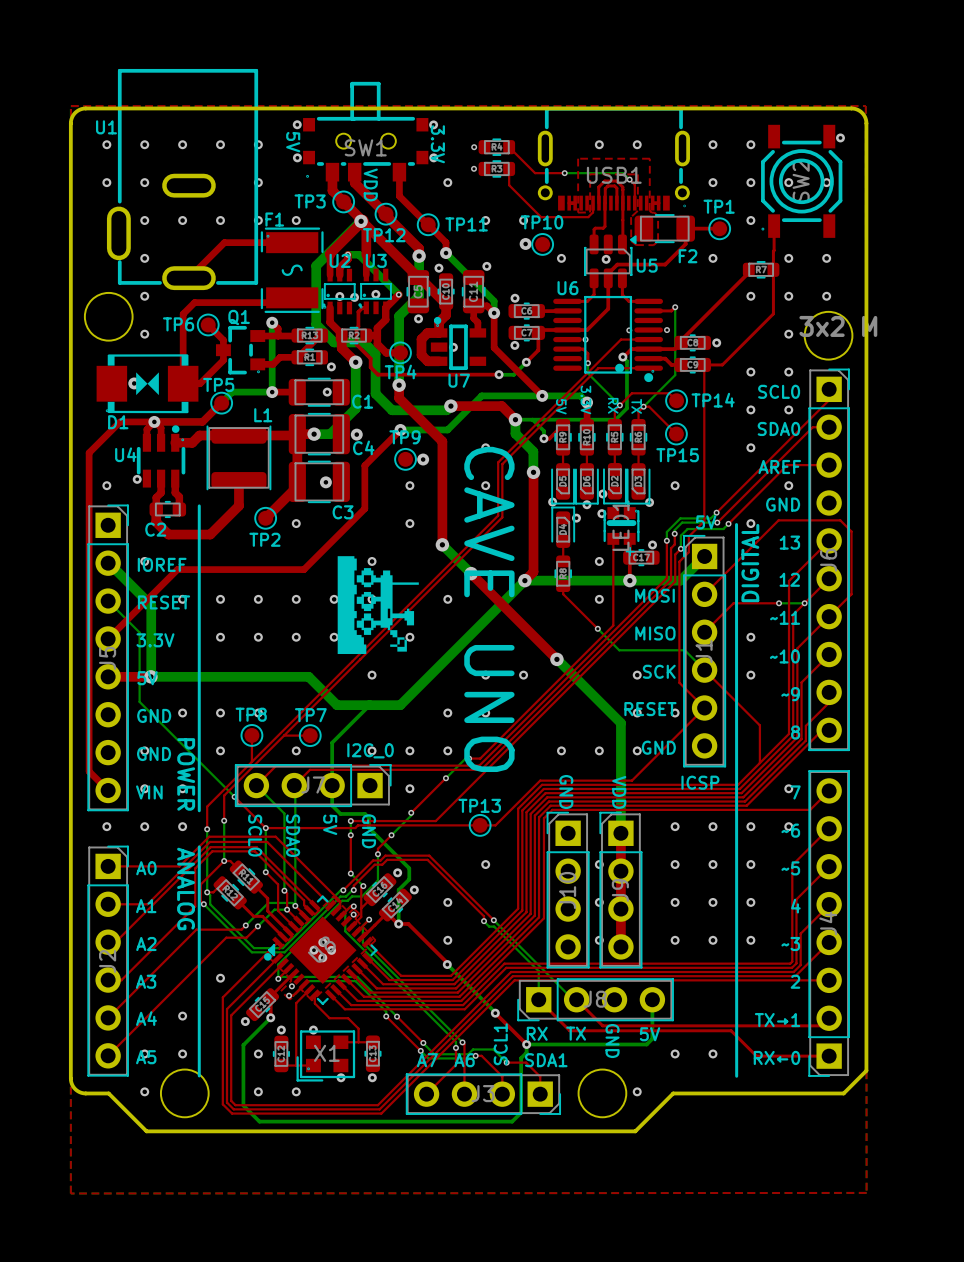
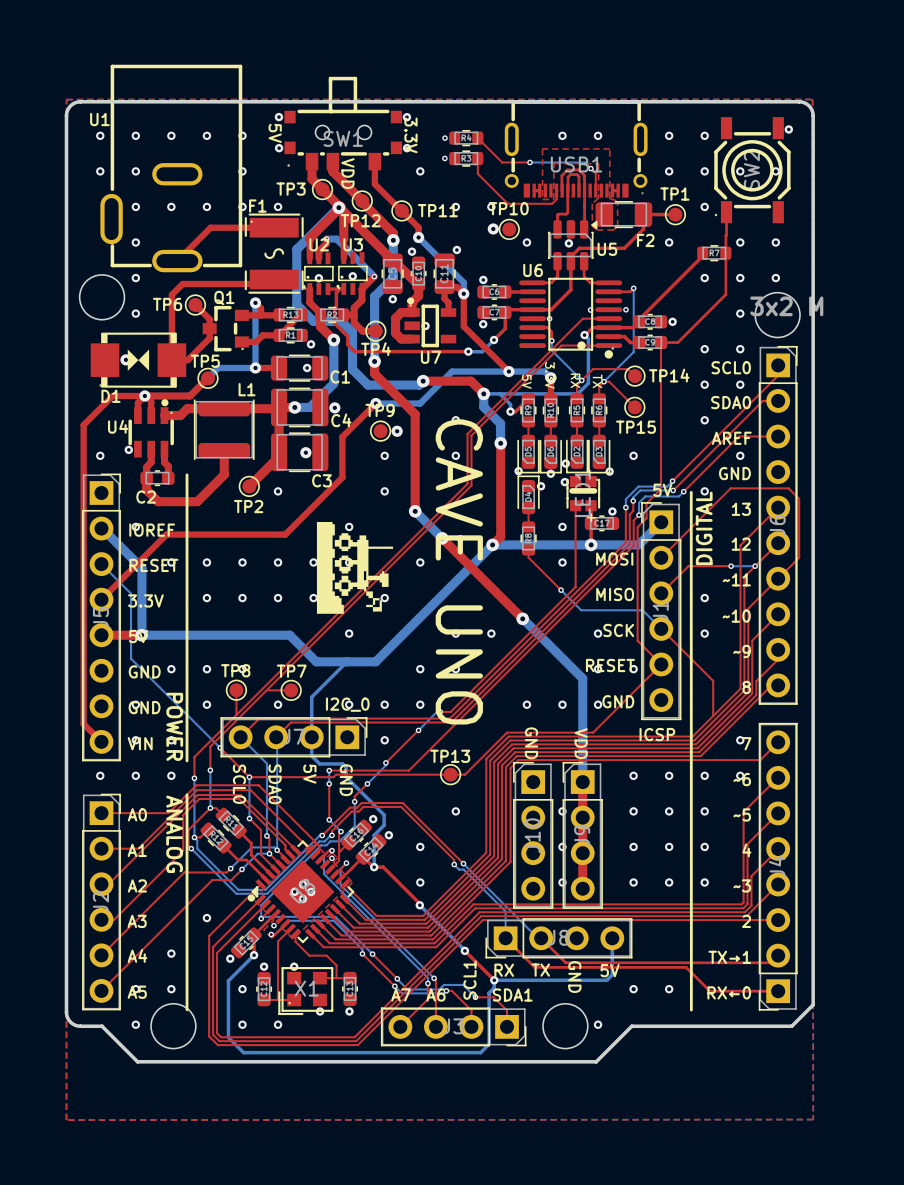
via: (354, 297) -> none
top track: none -> (327, 289) (340, 289)

